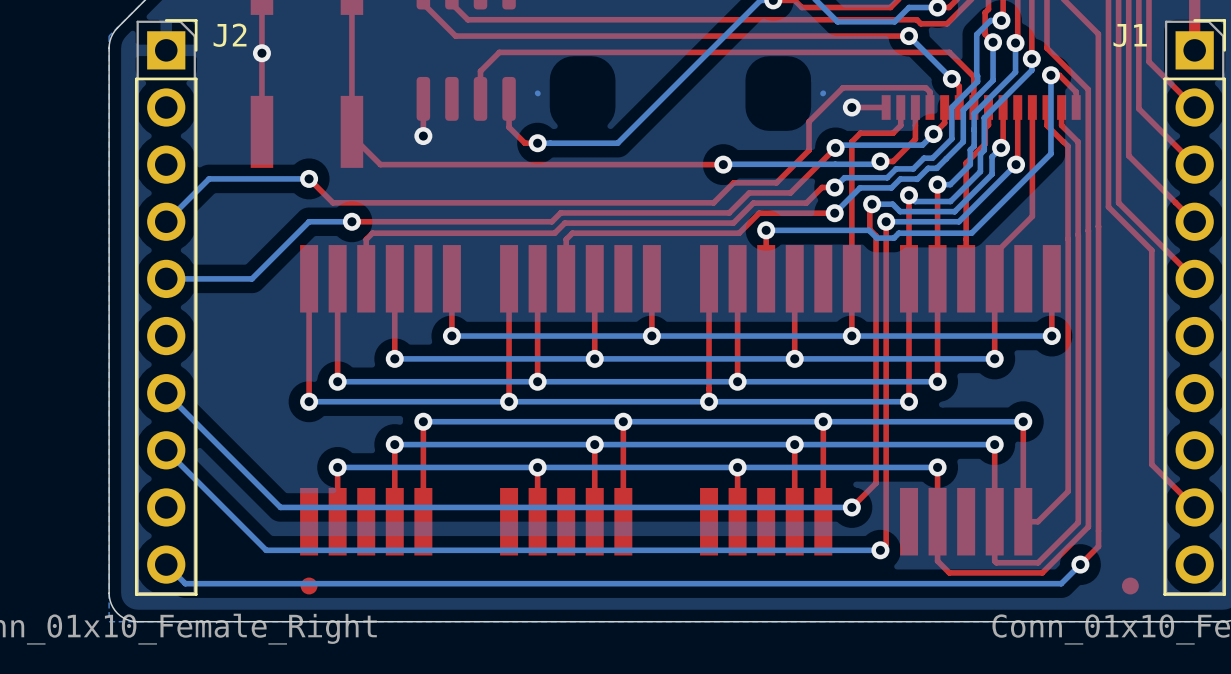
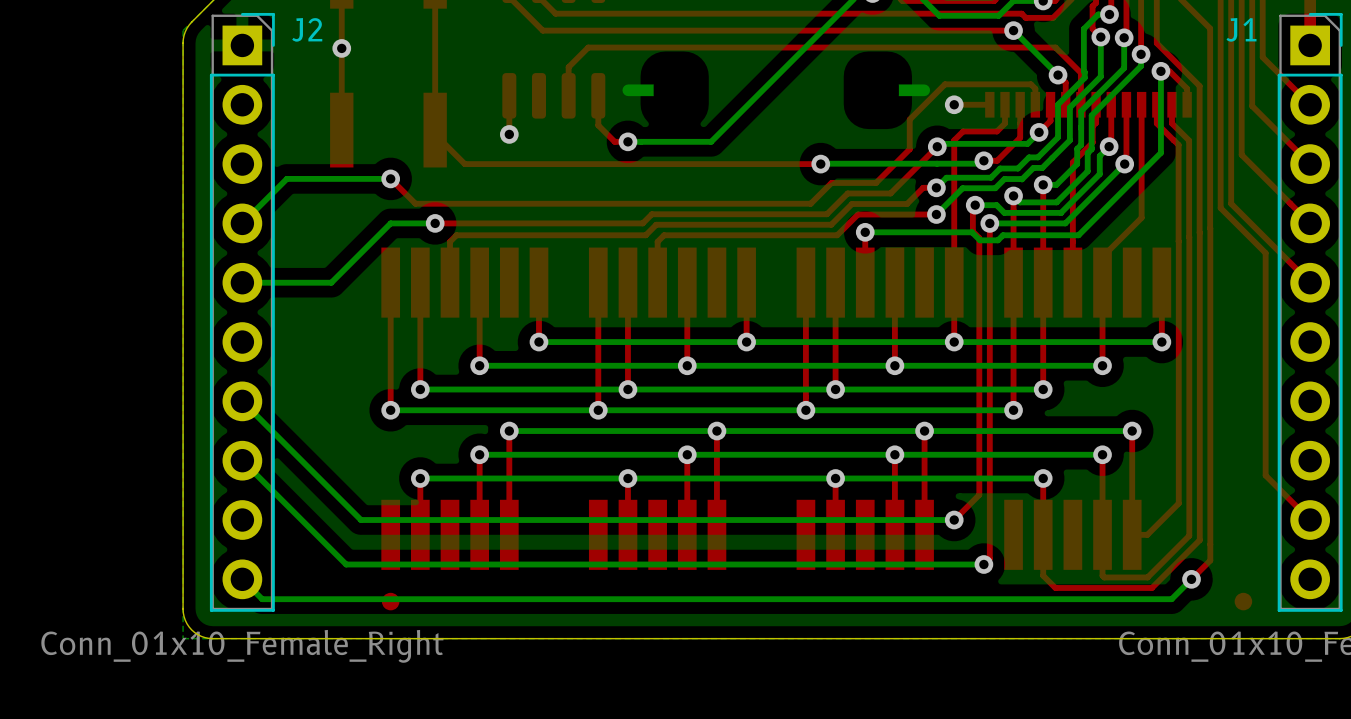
bottom track: none -> (674, 90) (628, 90)
bottom track: none -> (924, 90) (877, 90)

